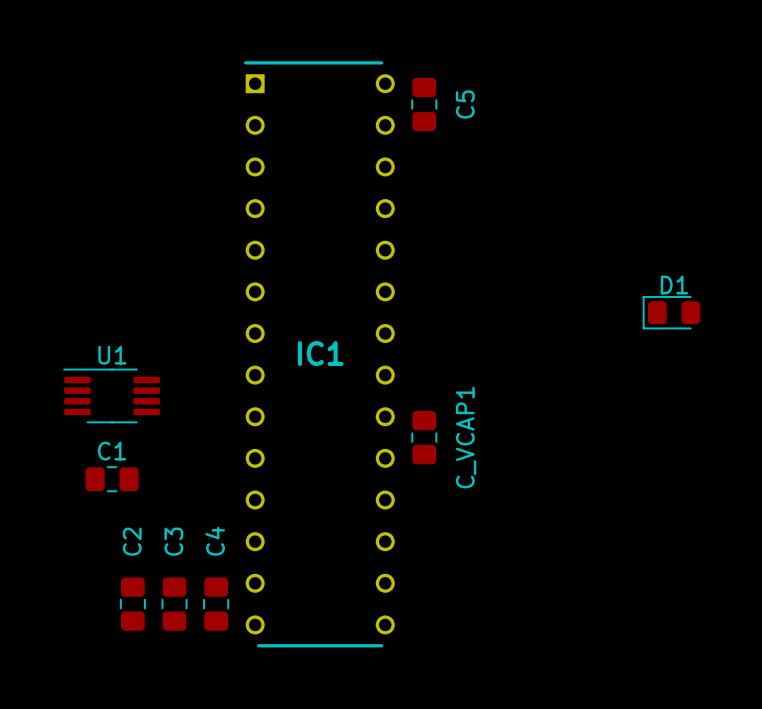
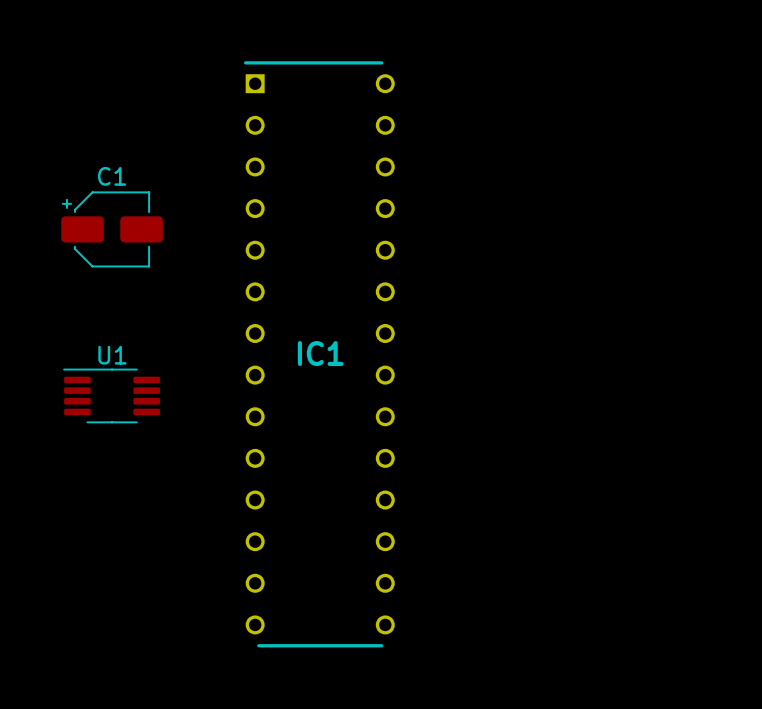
C5: (424, 104) -> none
D1: (671, 312) -> none
C_VCAP1: (424, 437) -> none
C1 footprint: [85, 466, 139, 493] -> [61, 191, 163, 268]
C2: (132, 604) -> none
C3: (174, 604) -> none
C4: (216, 604) -> none

